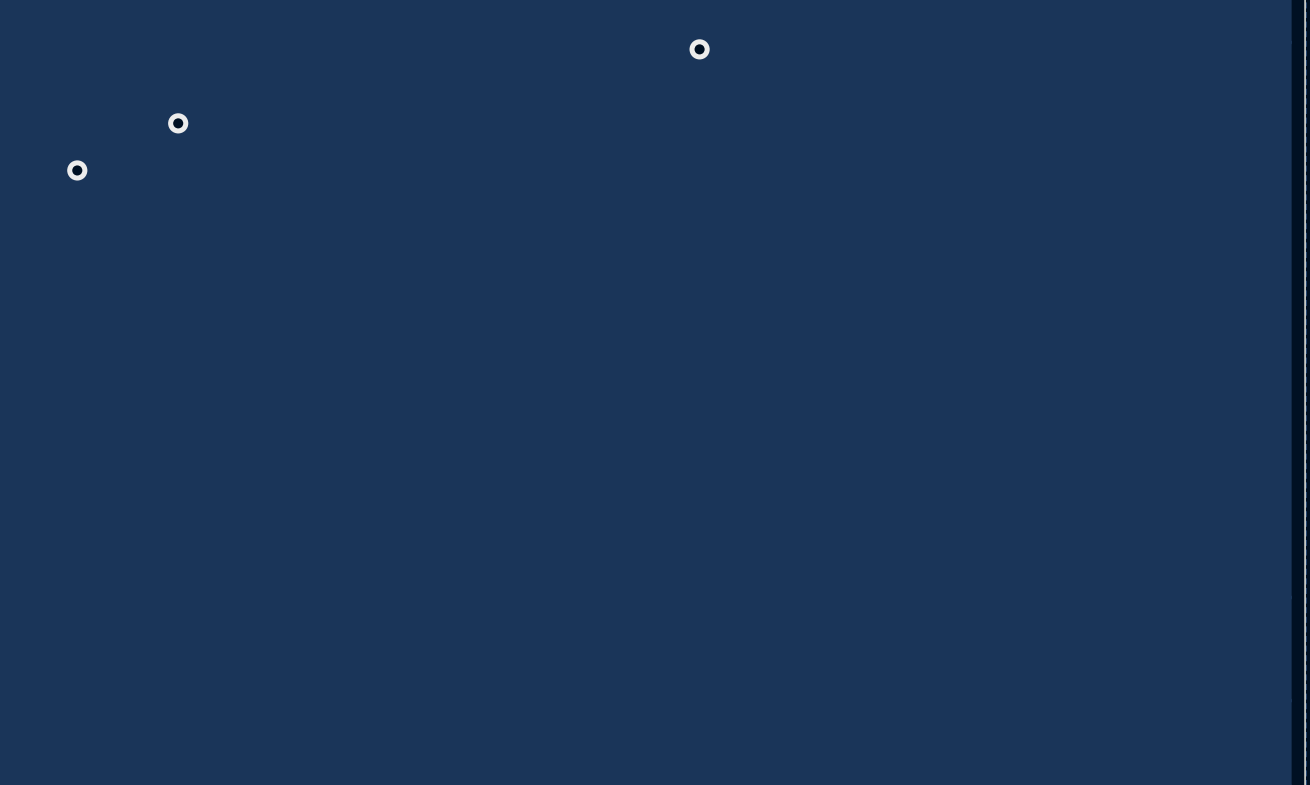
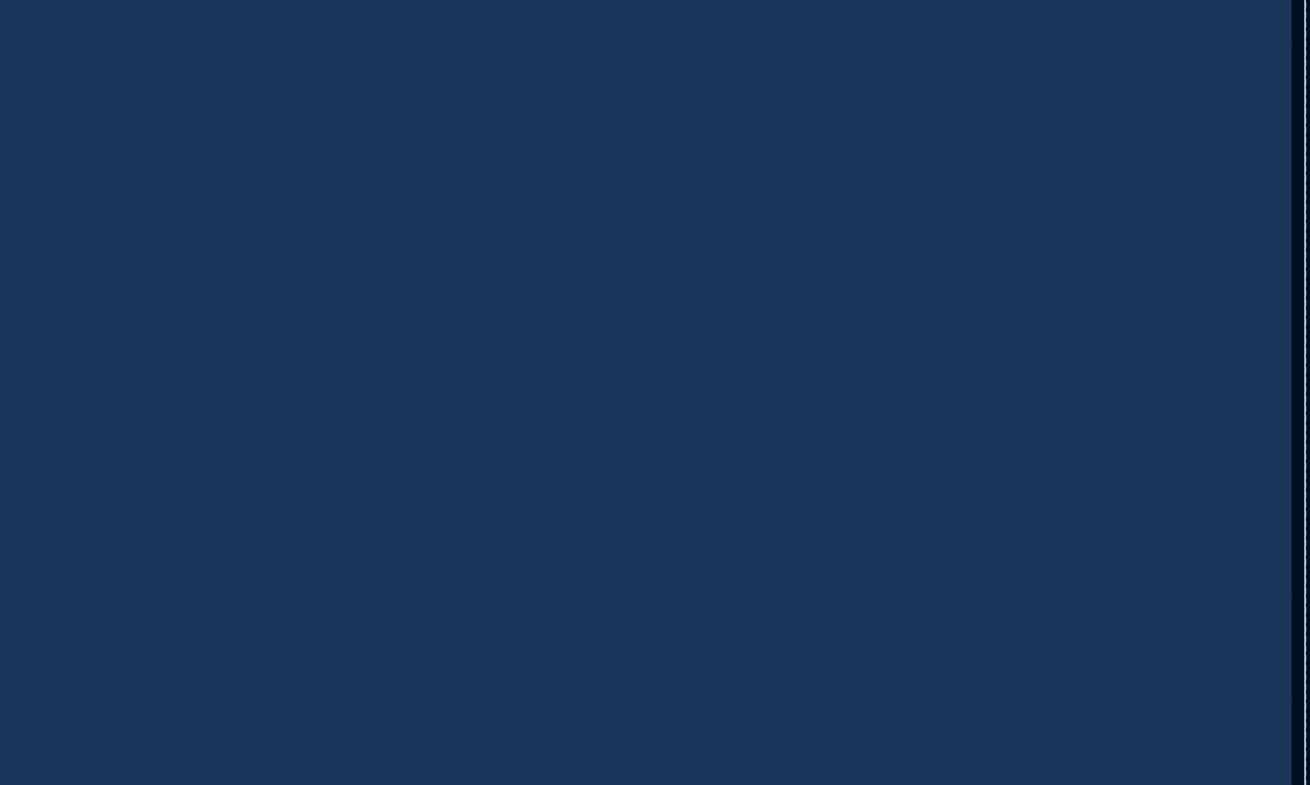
via: (699, 49) -> none
via: (178, 123) -> none
via: (77, 170) -> none

